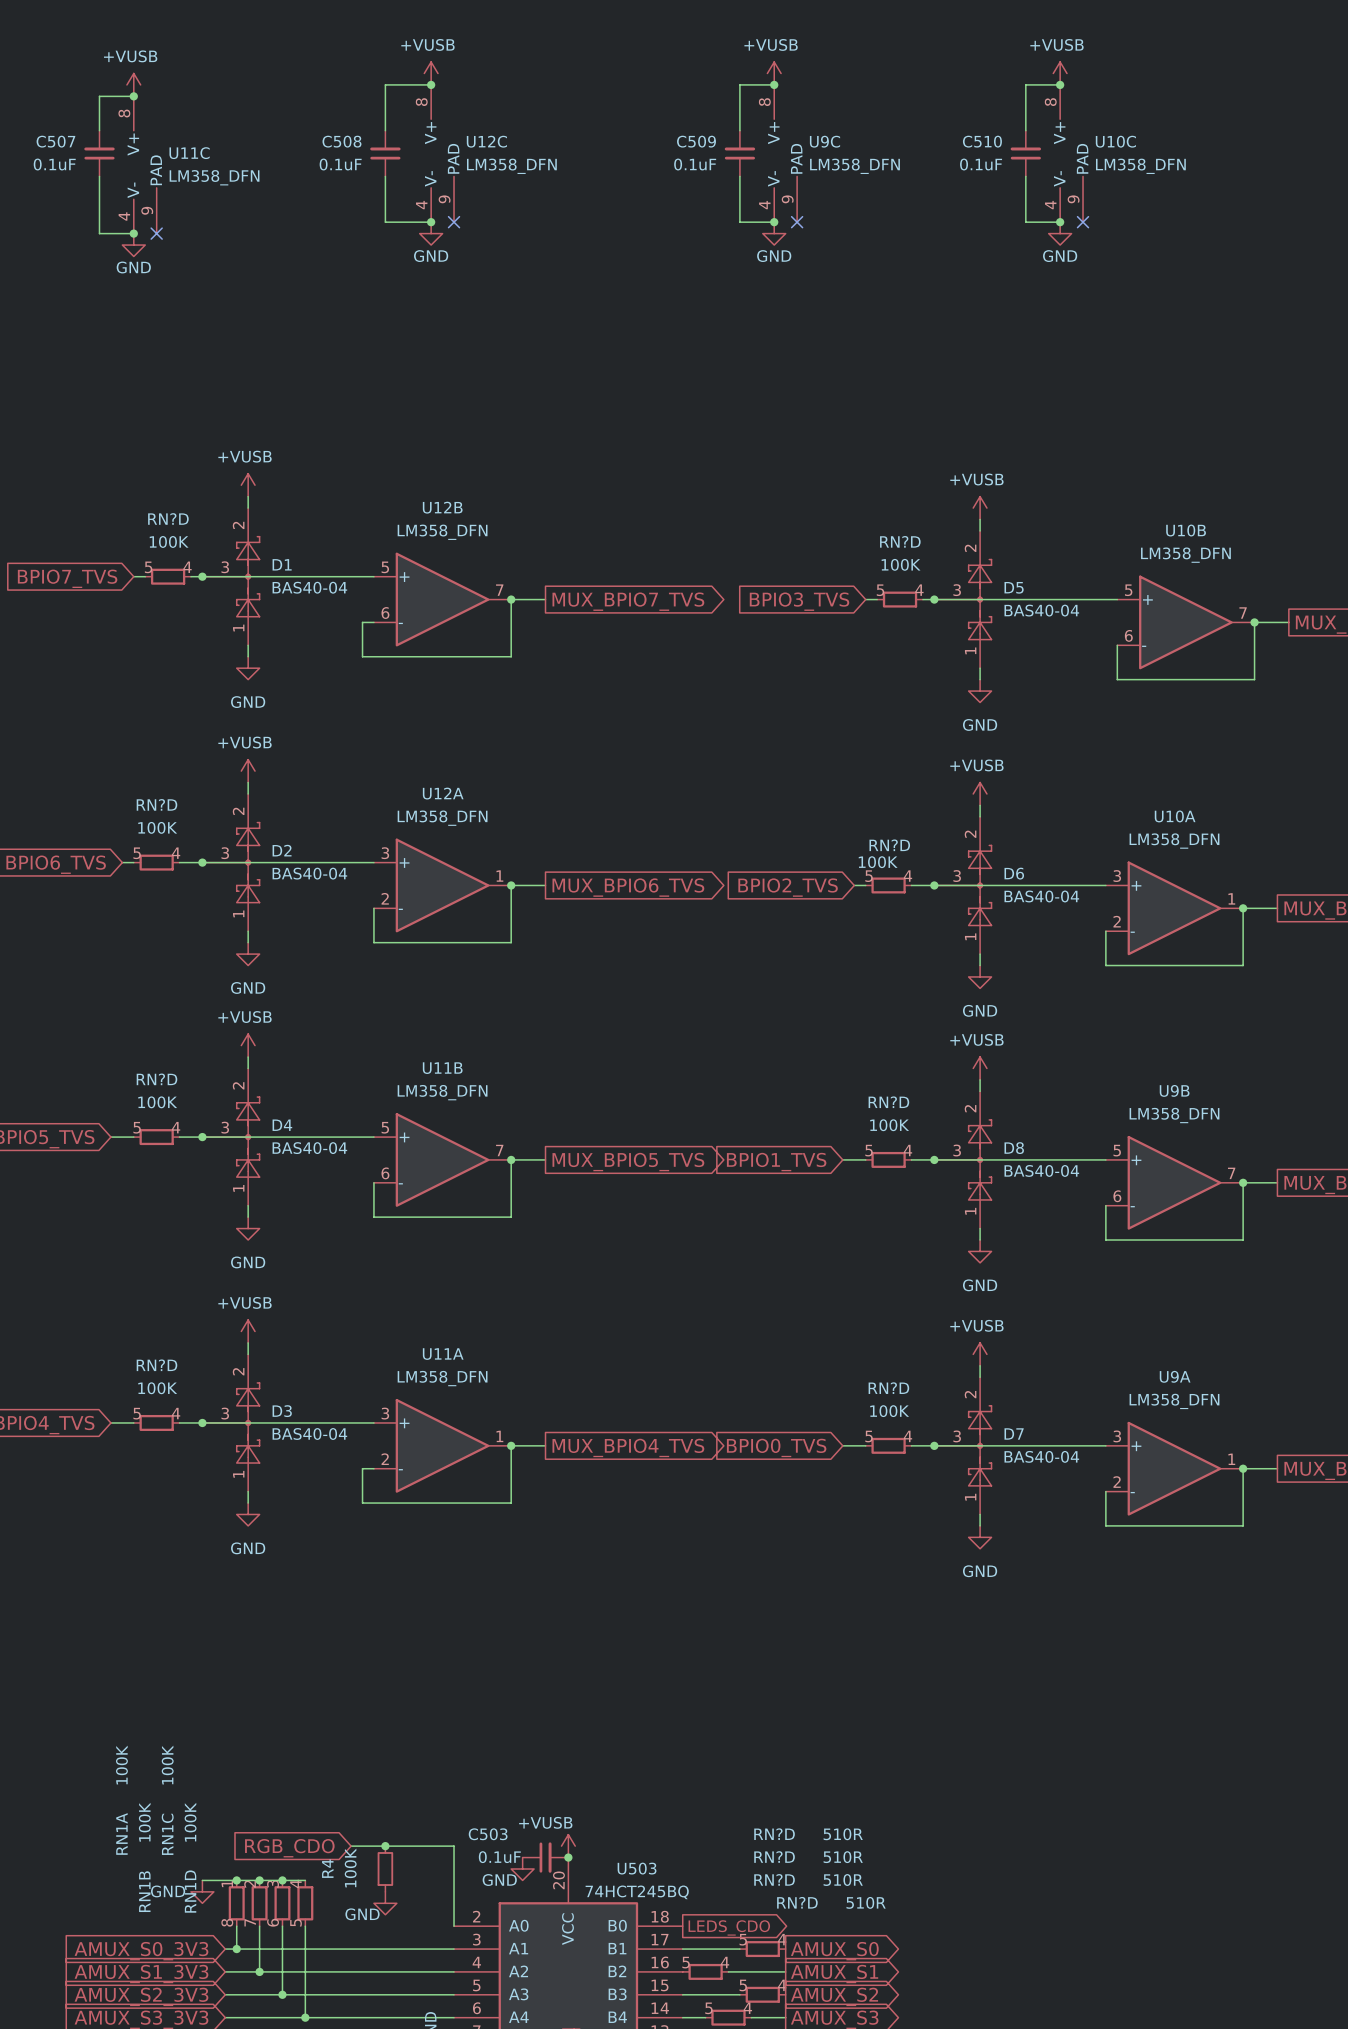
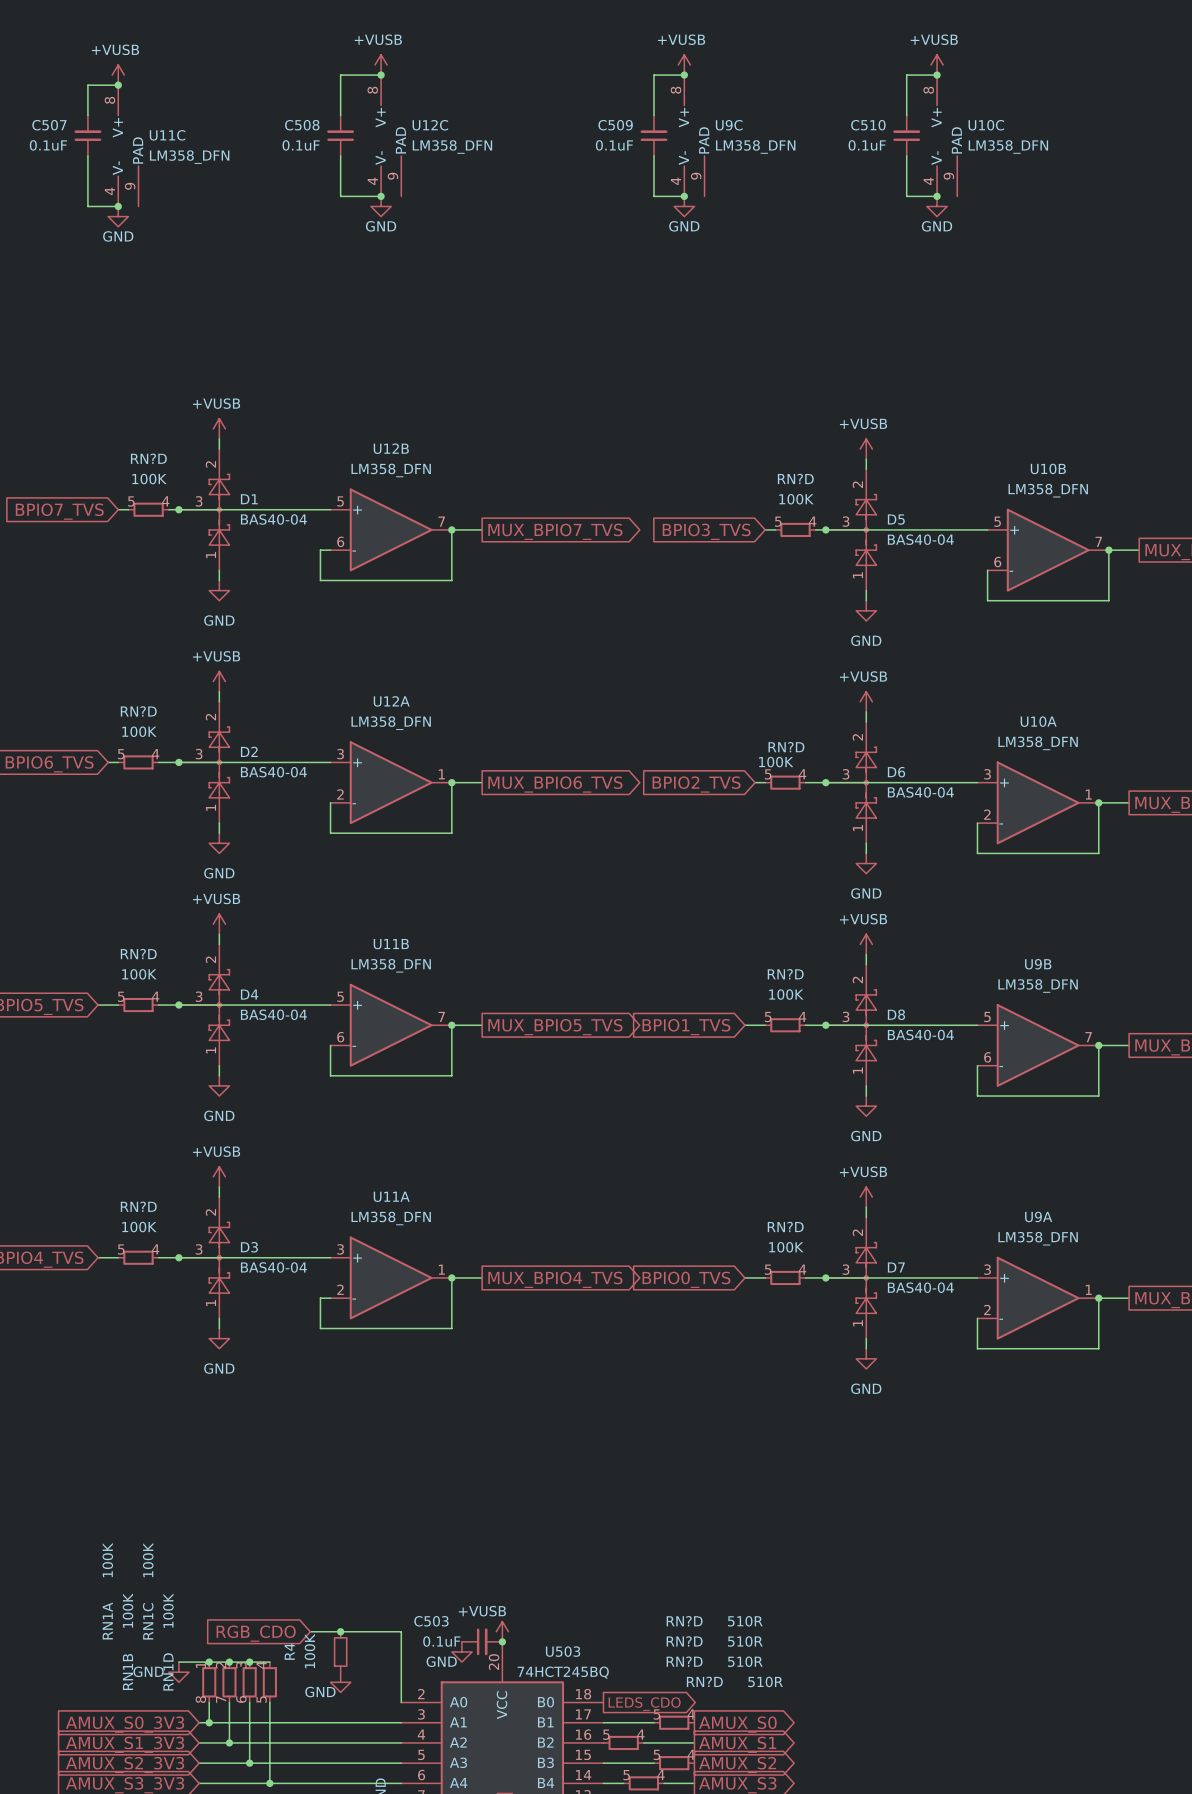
no-connect mark: (454, 222) -> none
no-connect mark: (797, 222) -> none
no-connect mark: (1083, 222) -> none
no-connect mark: (156, 233) -> none

